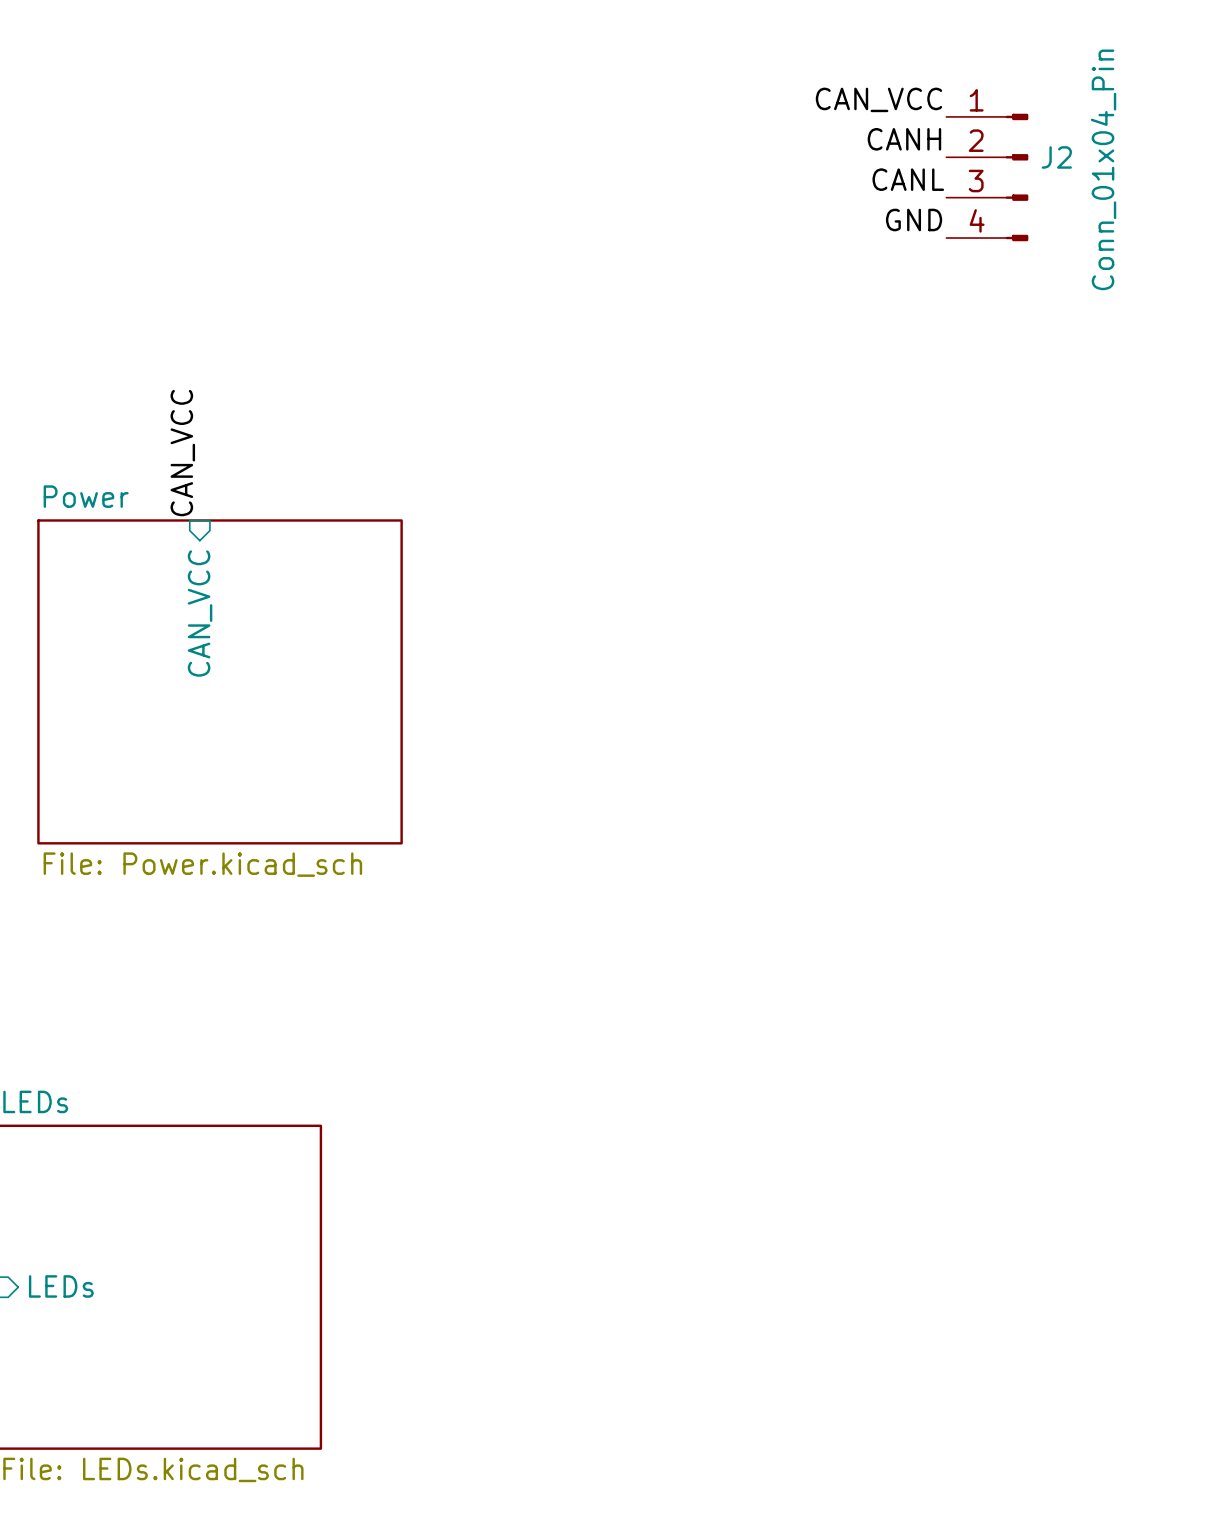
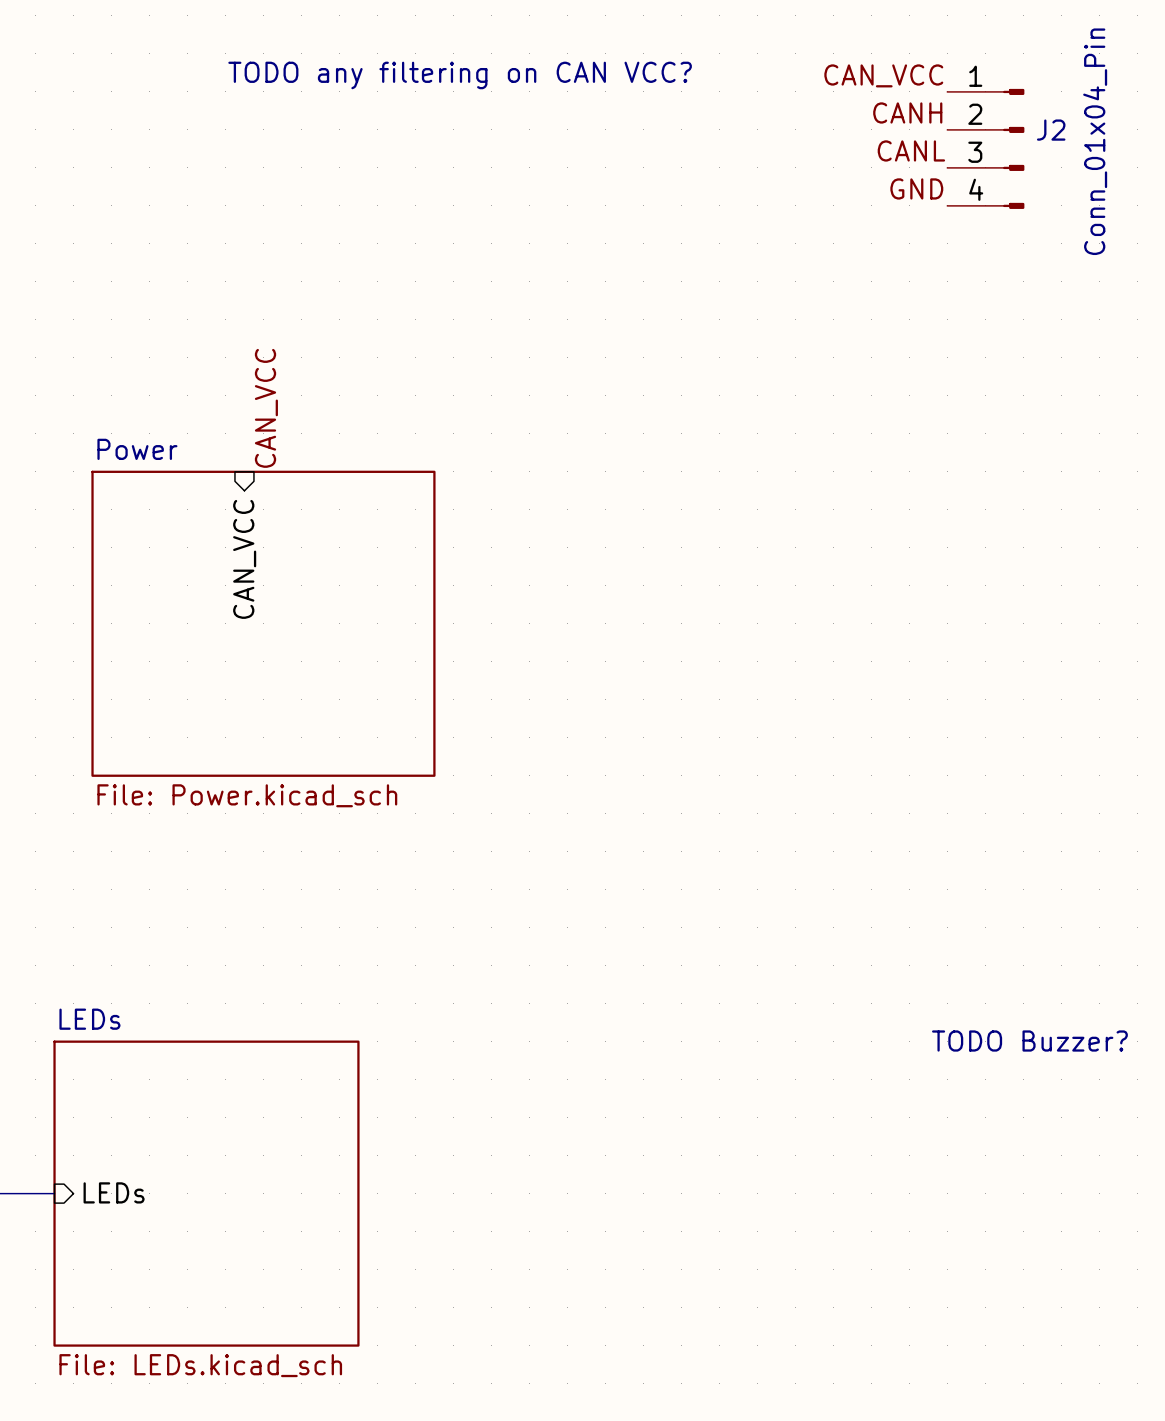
text: none -> TODO any filtering on CAN VCC? (460, 75)
label position: CAN_VCC (182, 453) -> CAN_VCC (266, 408)
text: none -> TODO Buzzer? (1029, 1041)

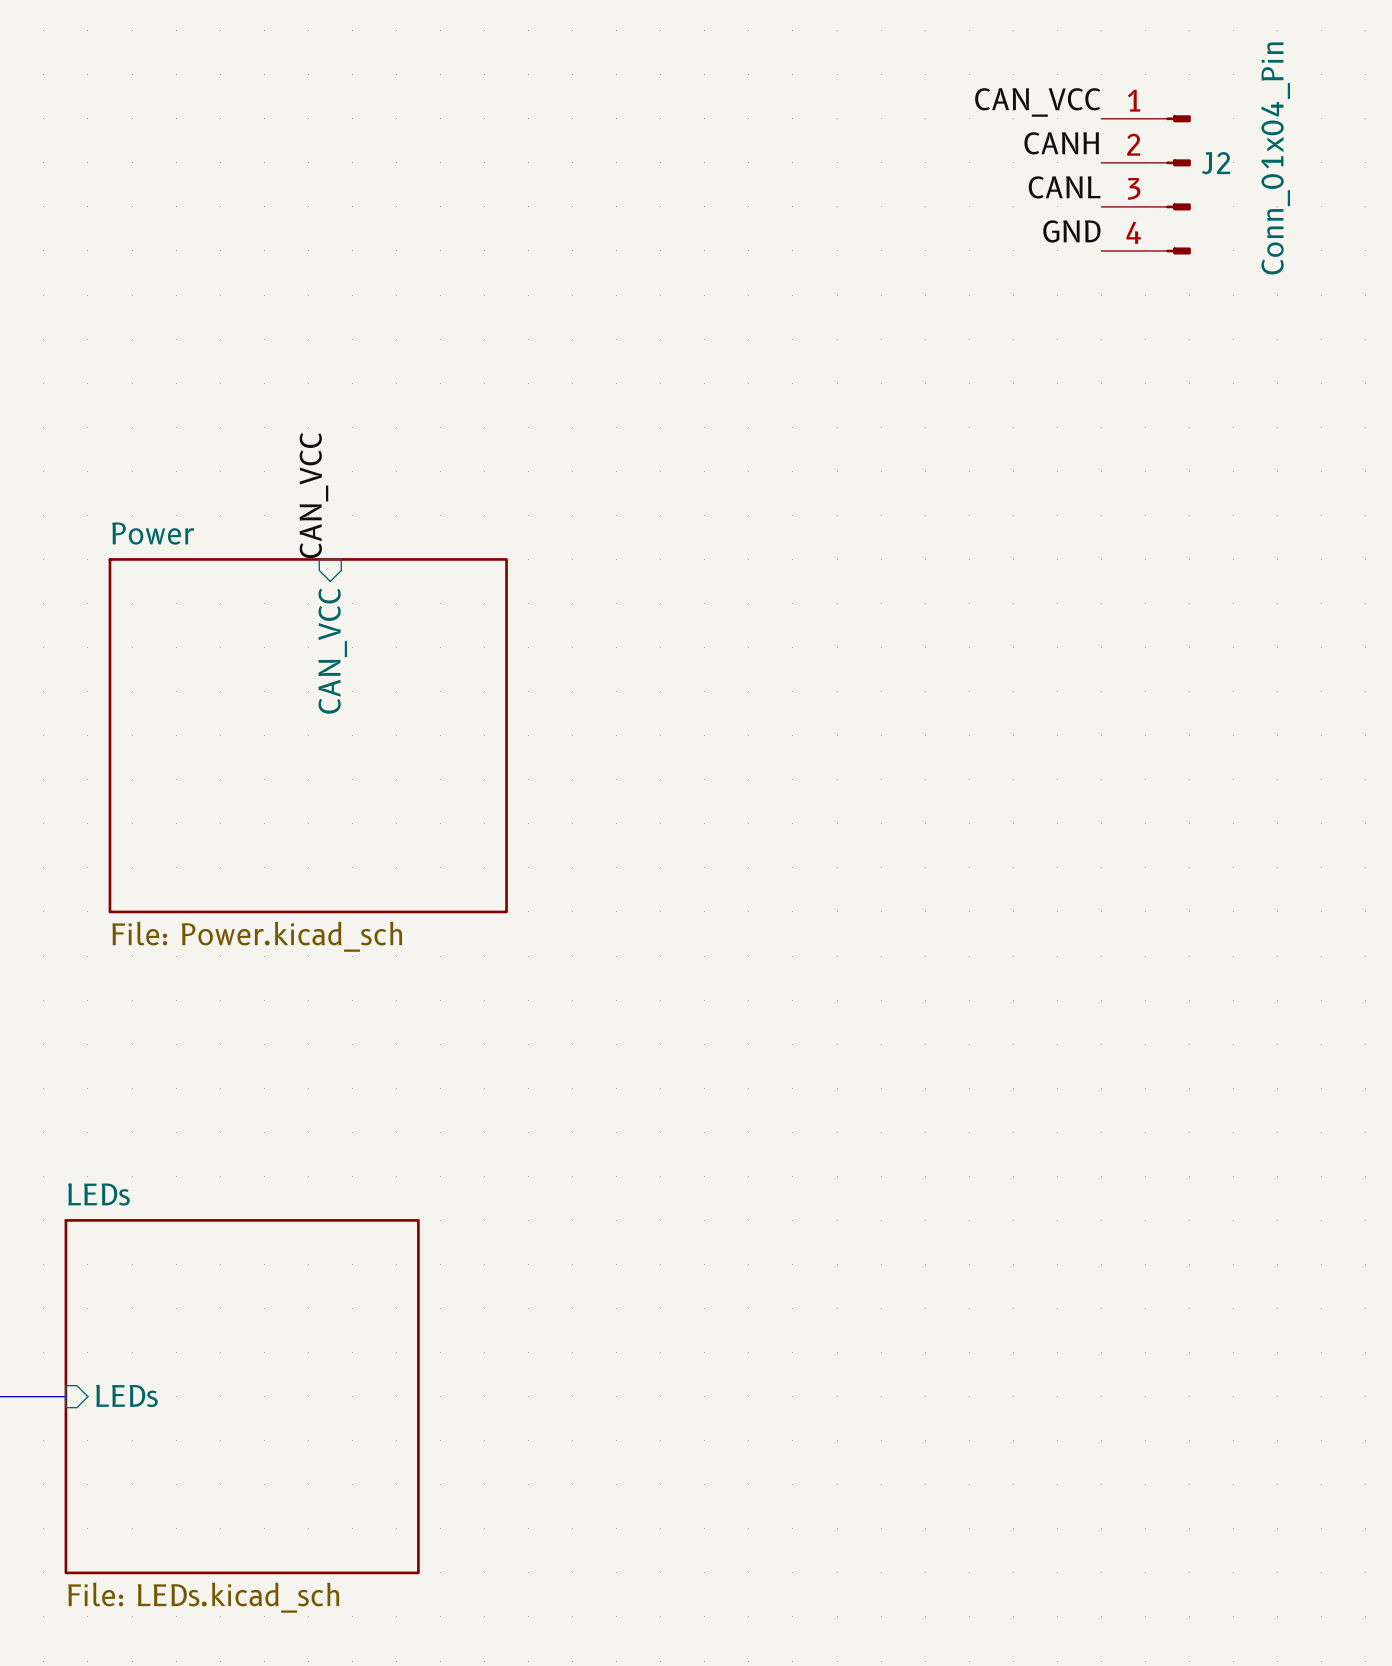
text: TODO any filtering on CAN VCC? (460, 75) -> none
sheet pin position: CAN_VCC (244, 559) -> CAN_VCC (332, 651)
text: TODO Buzzer? (1029, 1041) -> none

